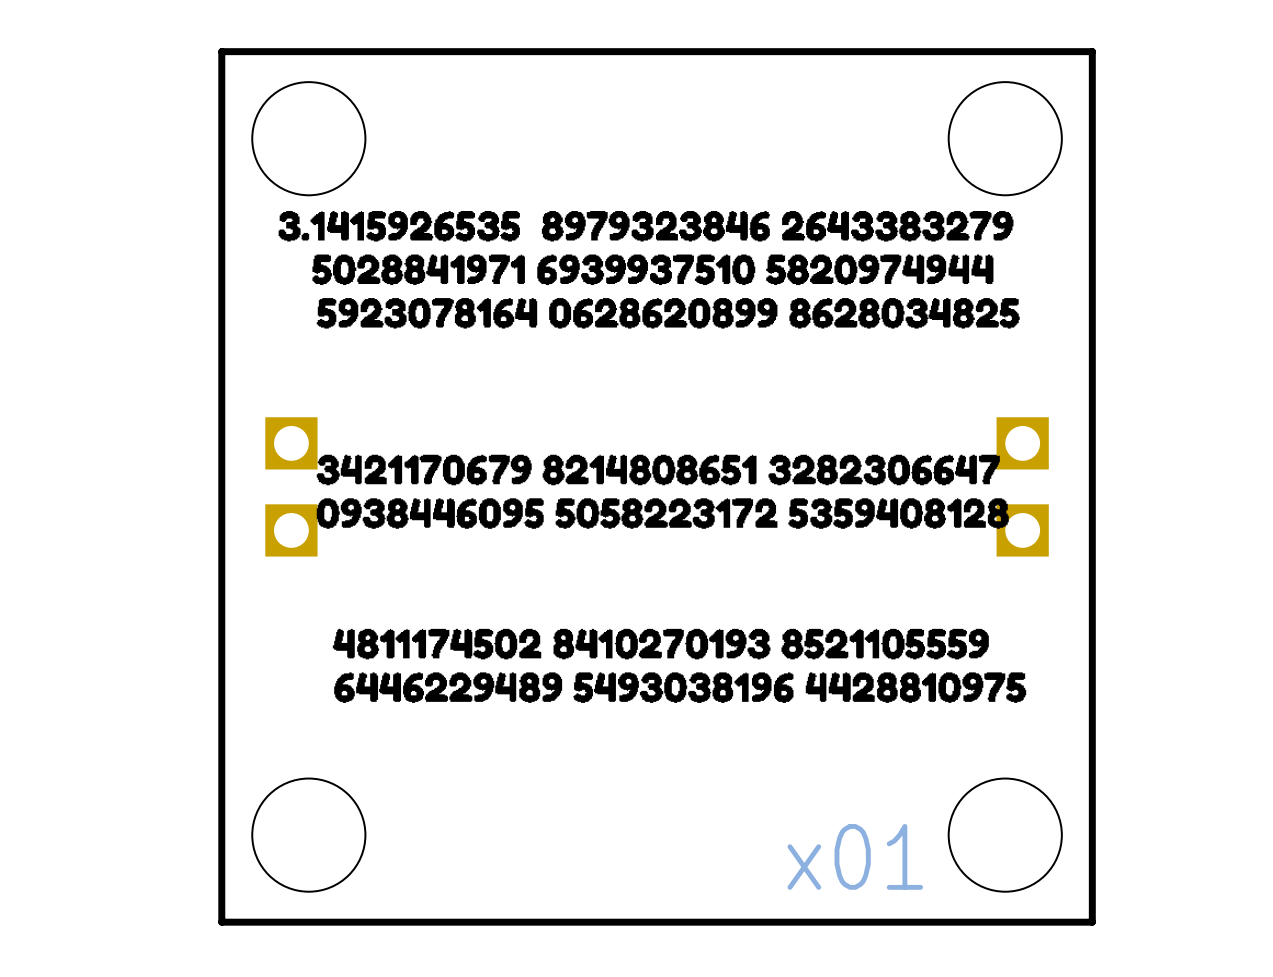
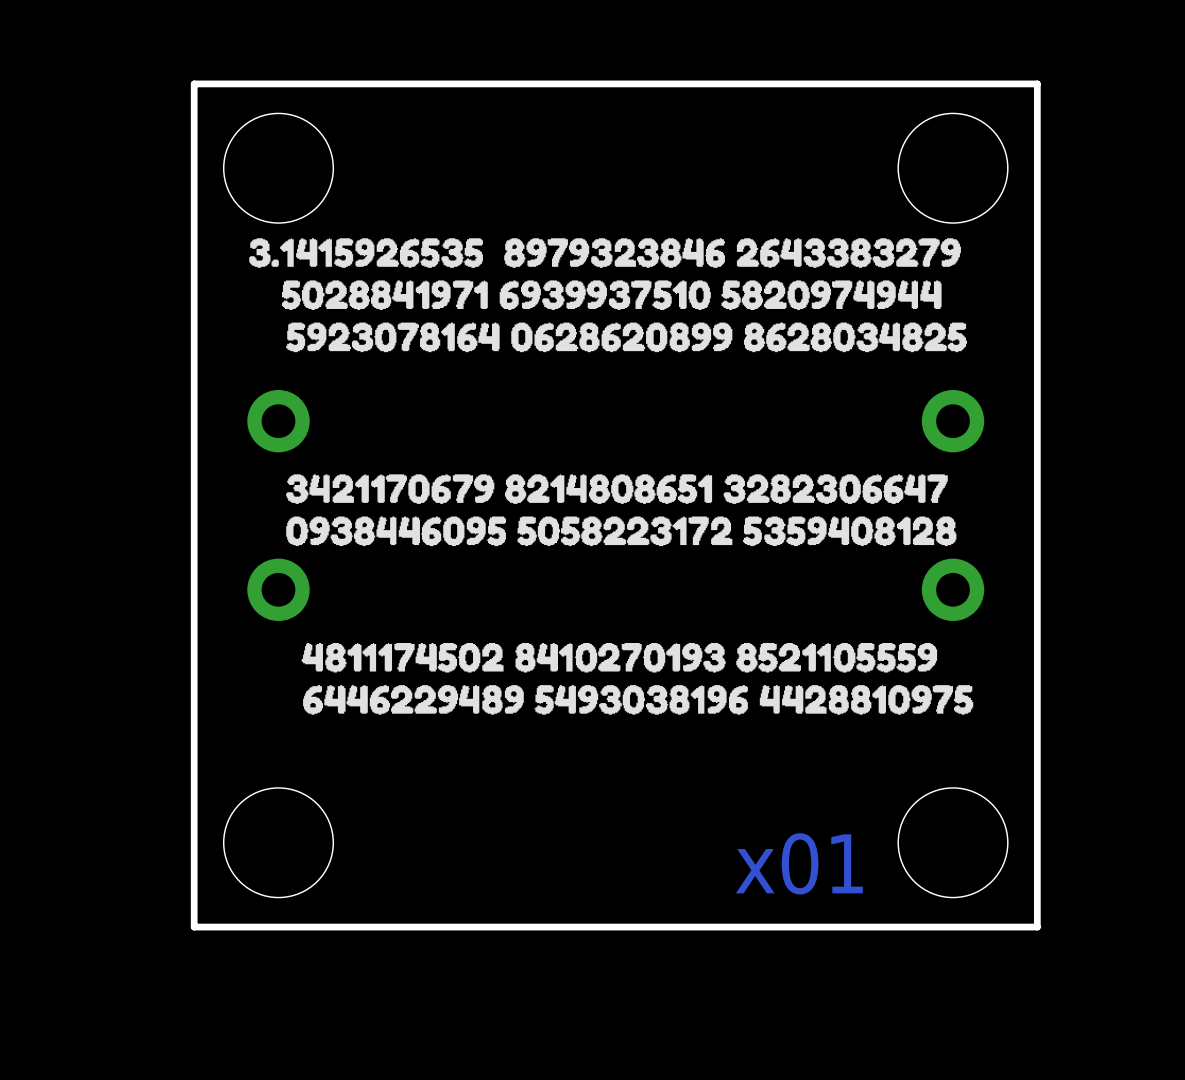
part: none -> (278, 421)
part: none -> (953, 421)
part: (291, 486) -> none
part: (1022, 486) -> none
part: none -> (278, 589)
part: none -> (953, 589)

